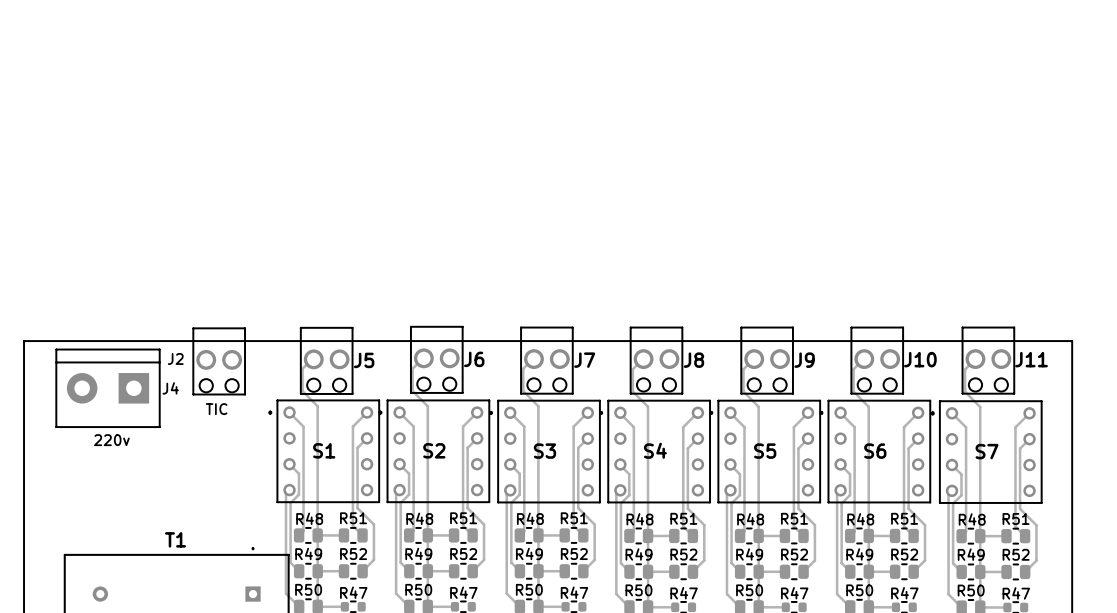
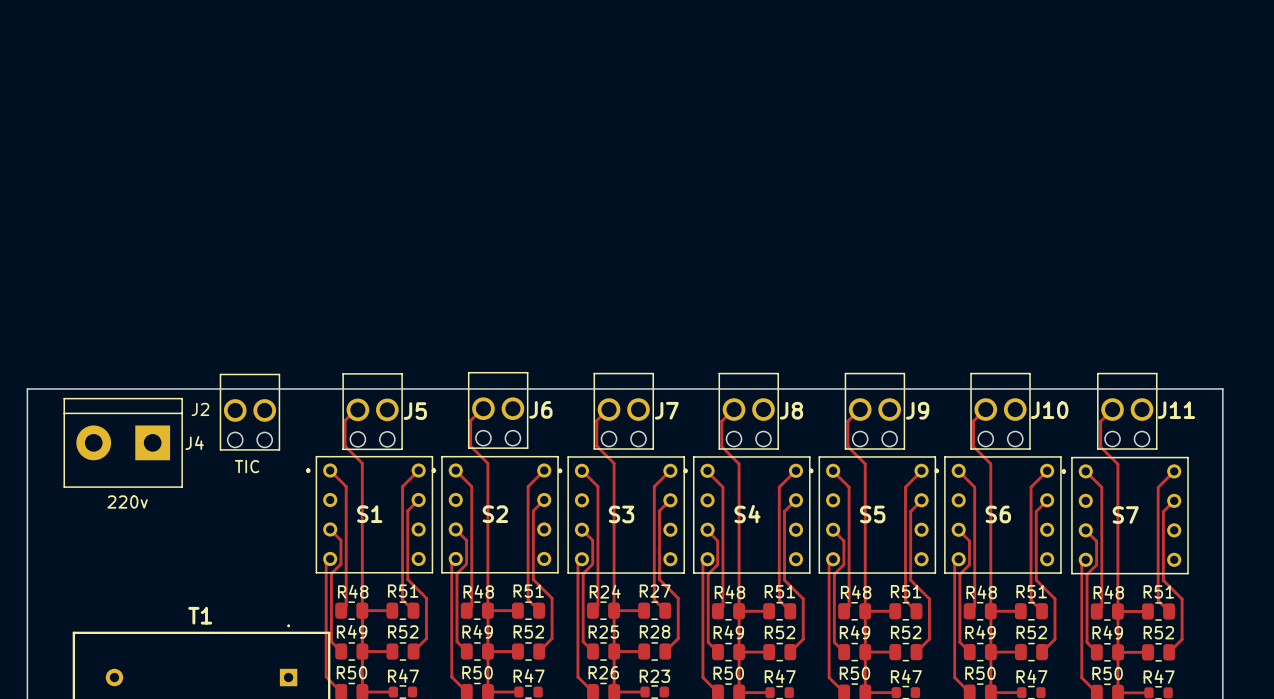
R48 name: R48 (530, 518) -> R24 (605, 591)
R51 name: R51 (574, 518) -> R27 (655, 591)
R49 name: R49 (529, 553) -> R25 (603, 632)
R52 name: R52 (574, 554) -> R28 (655, 631)
R50 name: R50 (529, 589) -> R26 (603, 672)
R47 name: R47 (574, 592) -> R23 (654, 676)

